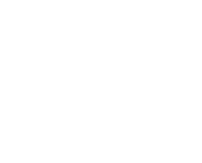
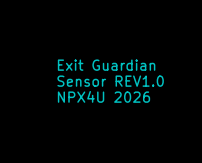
text: none -> Exit Guardian (106, 65)
text: none -> Sensor REV1.0 (110, 81)
text: none -> NPX4U 2026 (103, 96)

